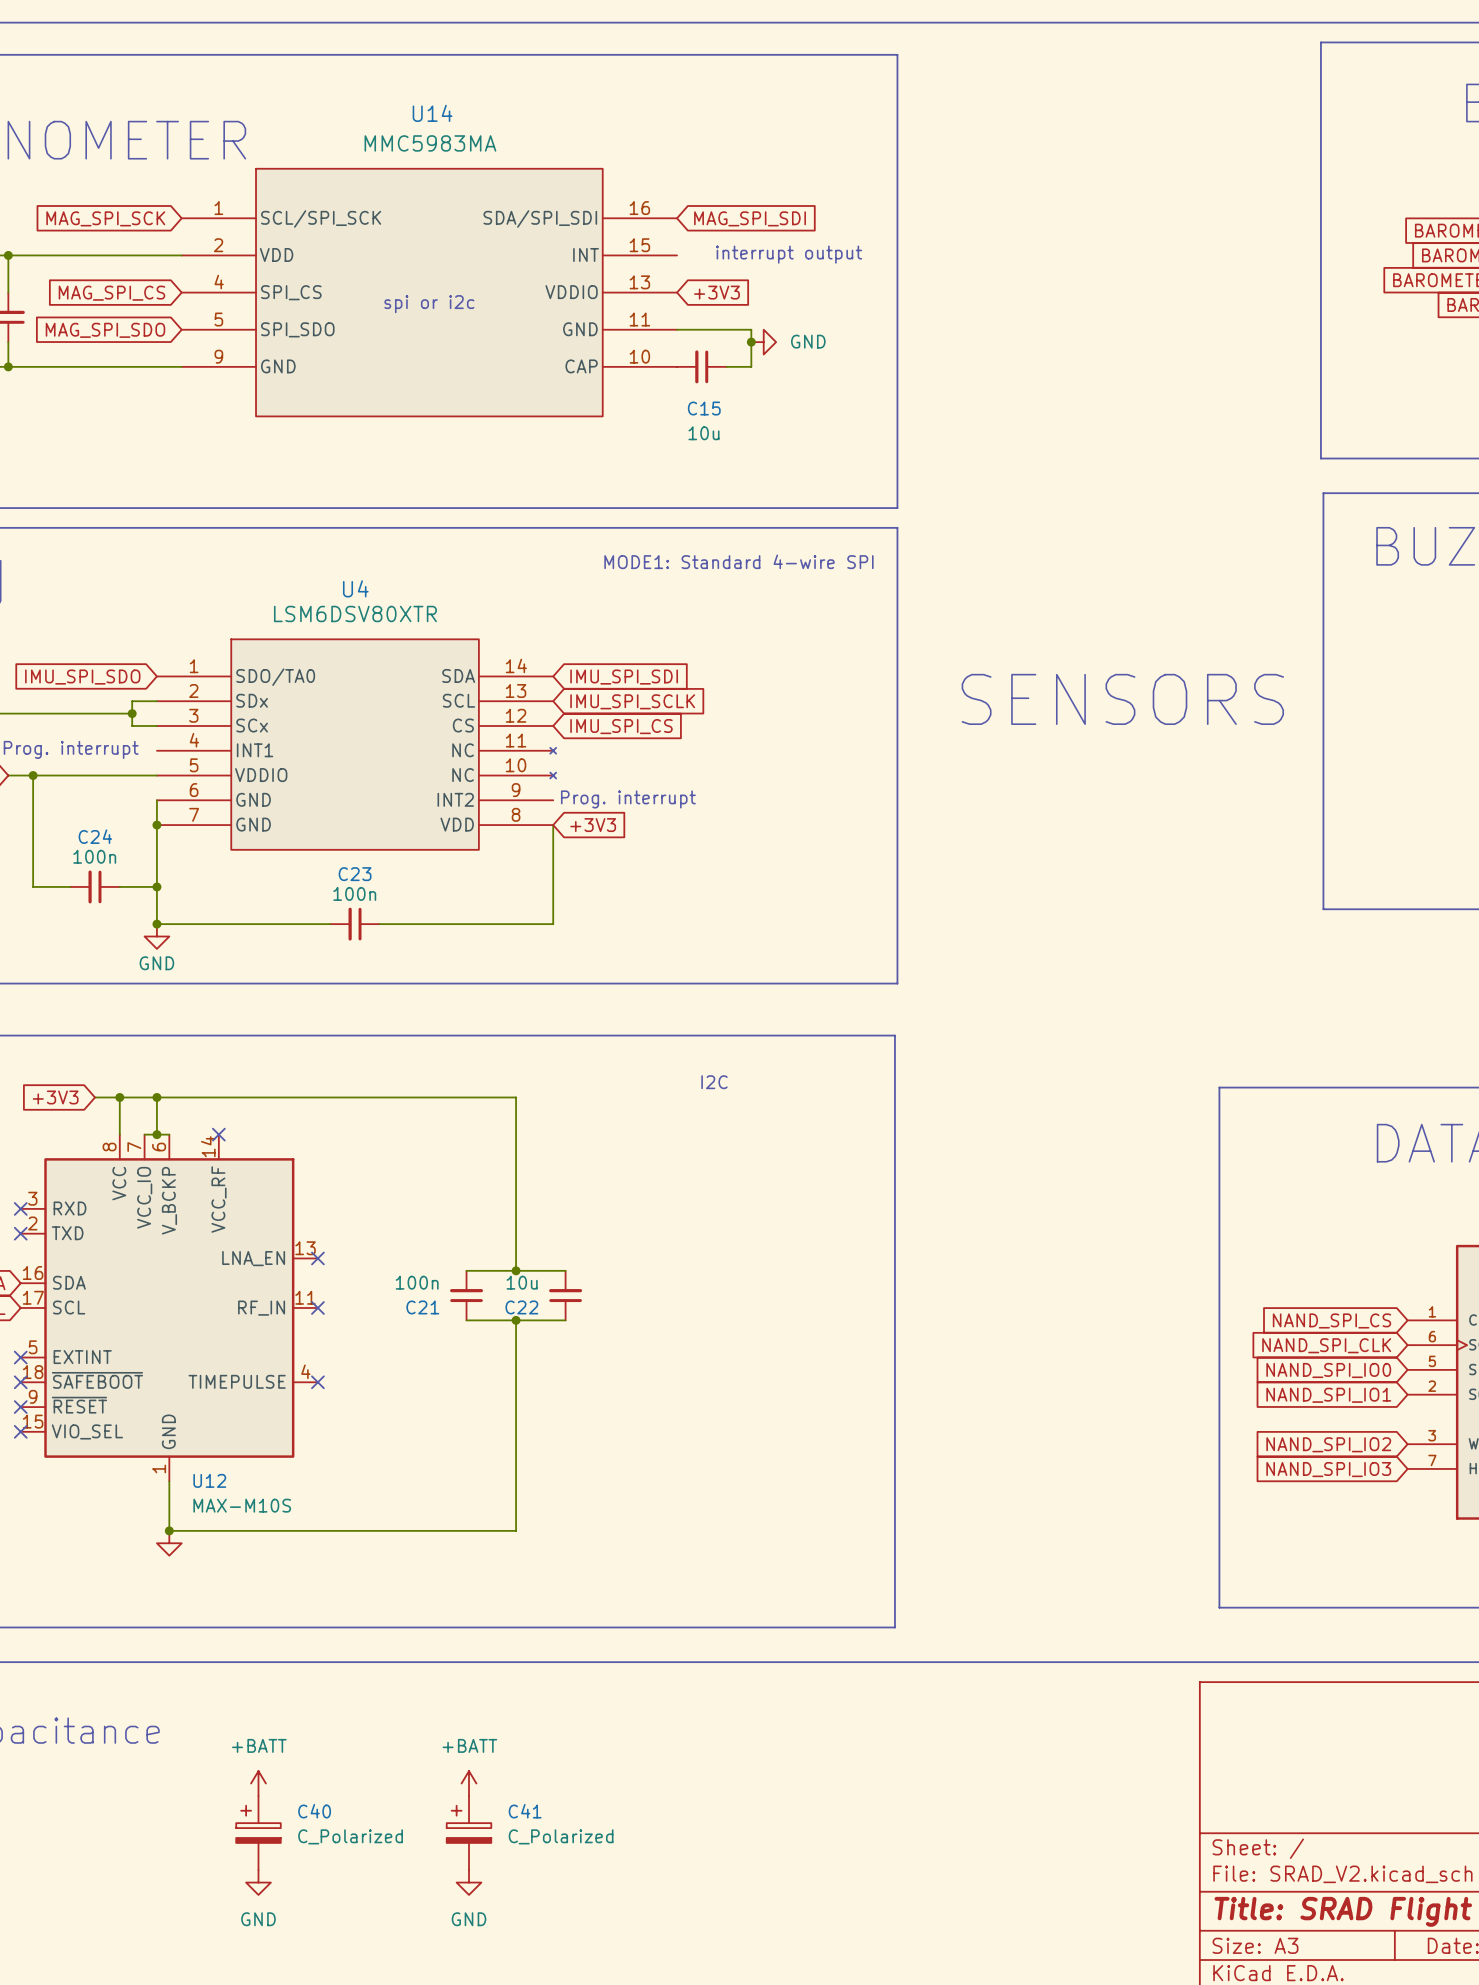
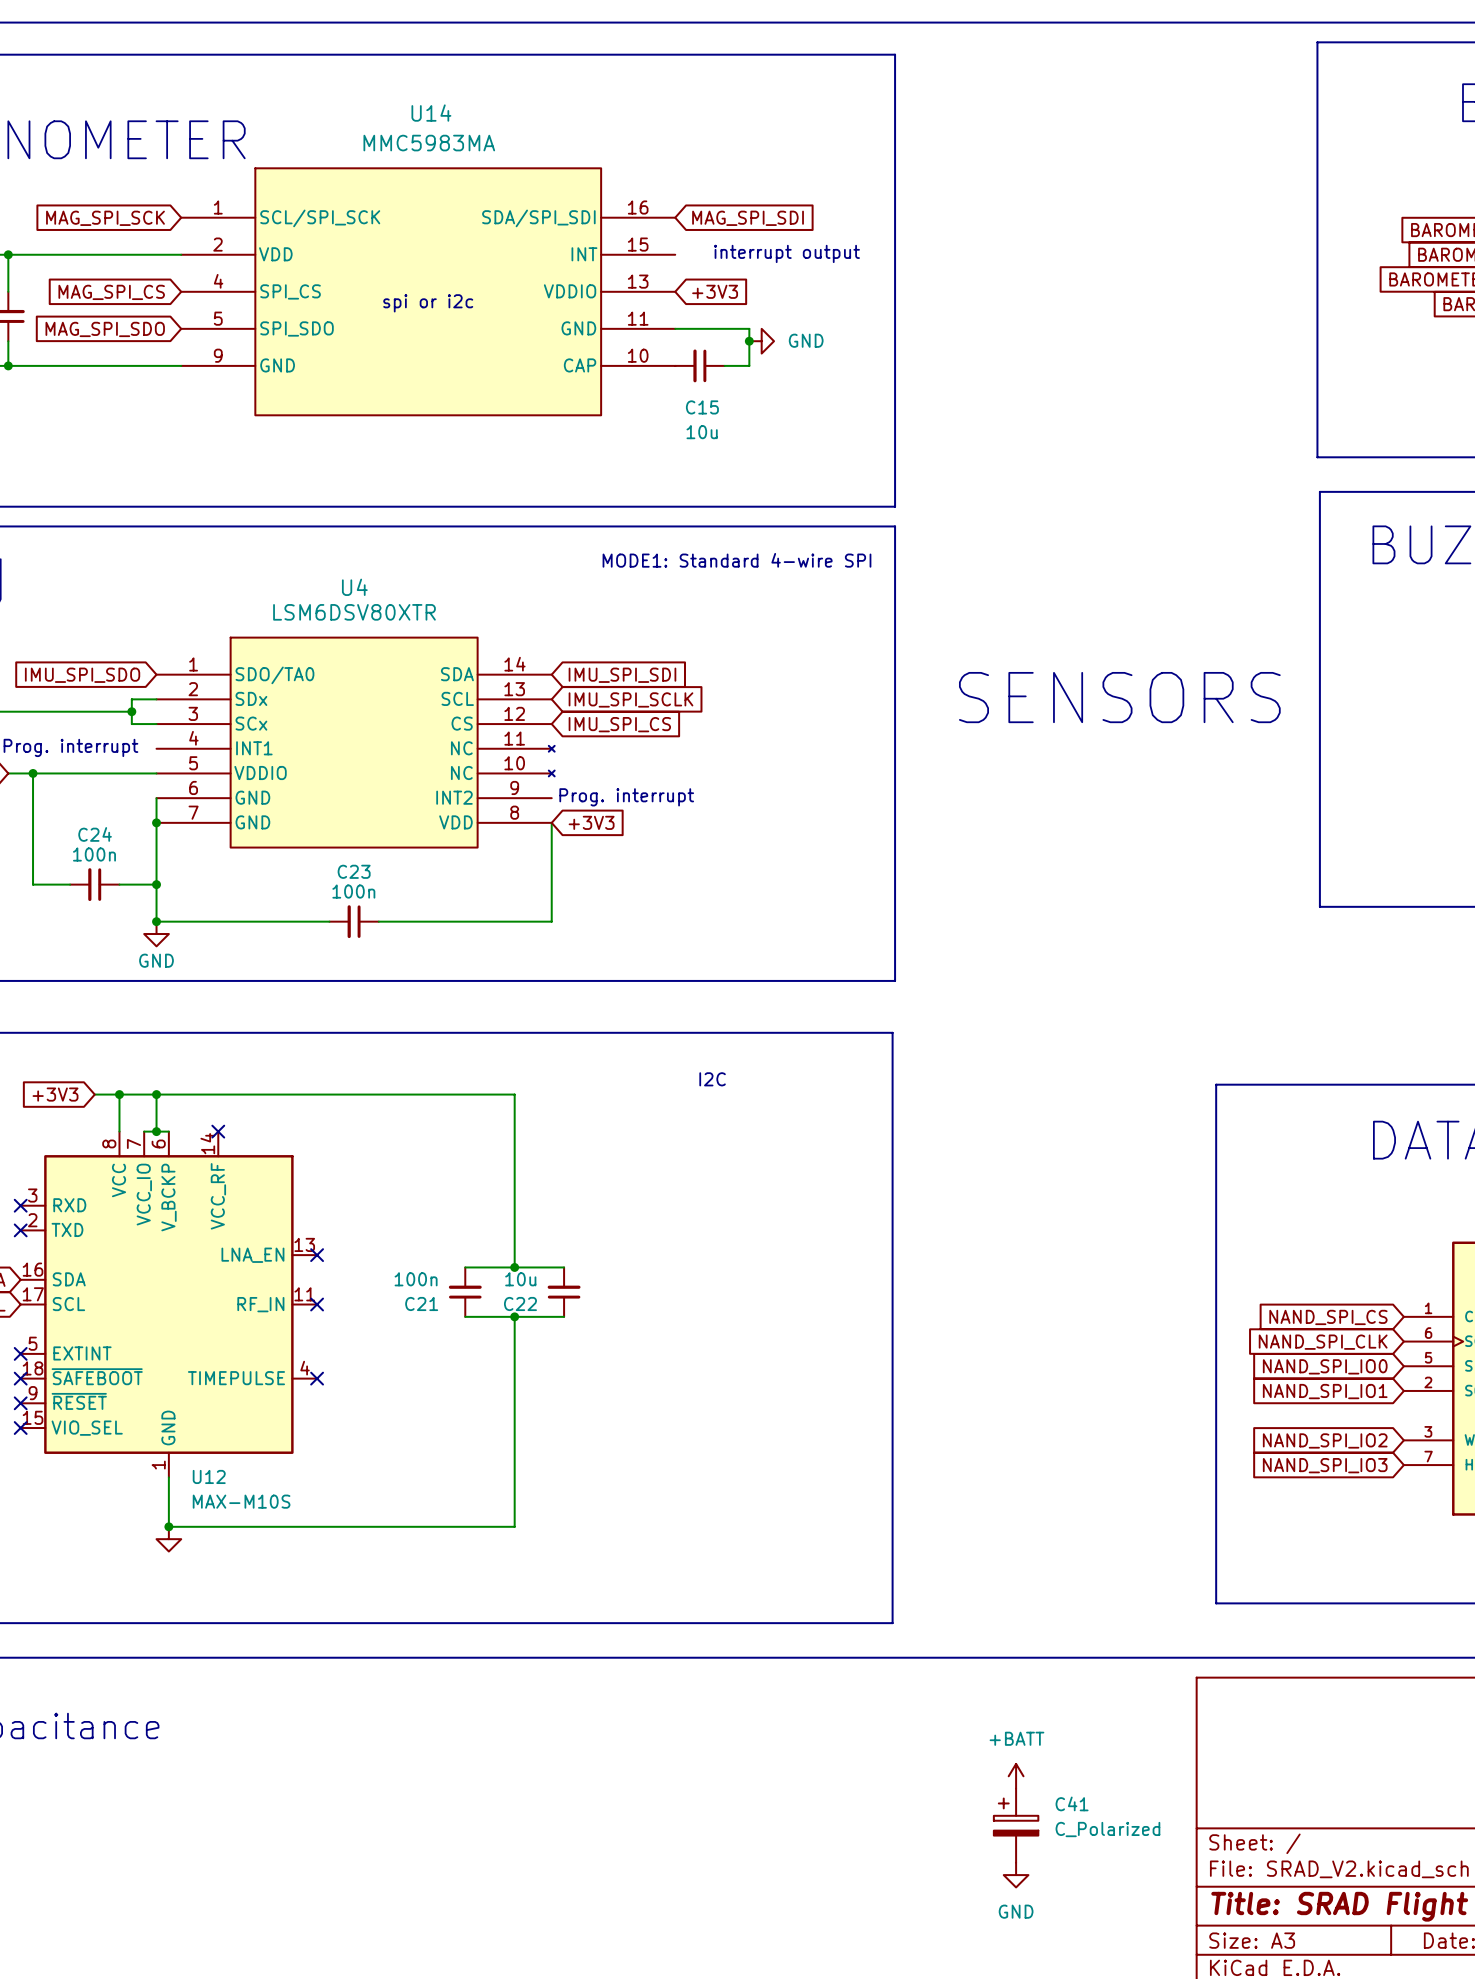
power symbol: none -> +BATT (1016, 1776)
power symbol: +BATT (258, 1783) -> none
power symbol: +BATT (469, 1783) -> none
C40: C_Polarized (258, 1833) -> none
C41 position: (469, 1833) -> (1016, 1825)
power symbol: none -> GND (1016, 1875)
power symbol: GND (258, 1882) -> none
power symbol: GND (469, 1882) -> none

